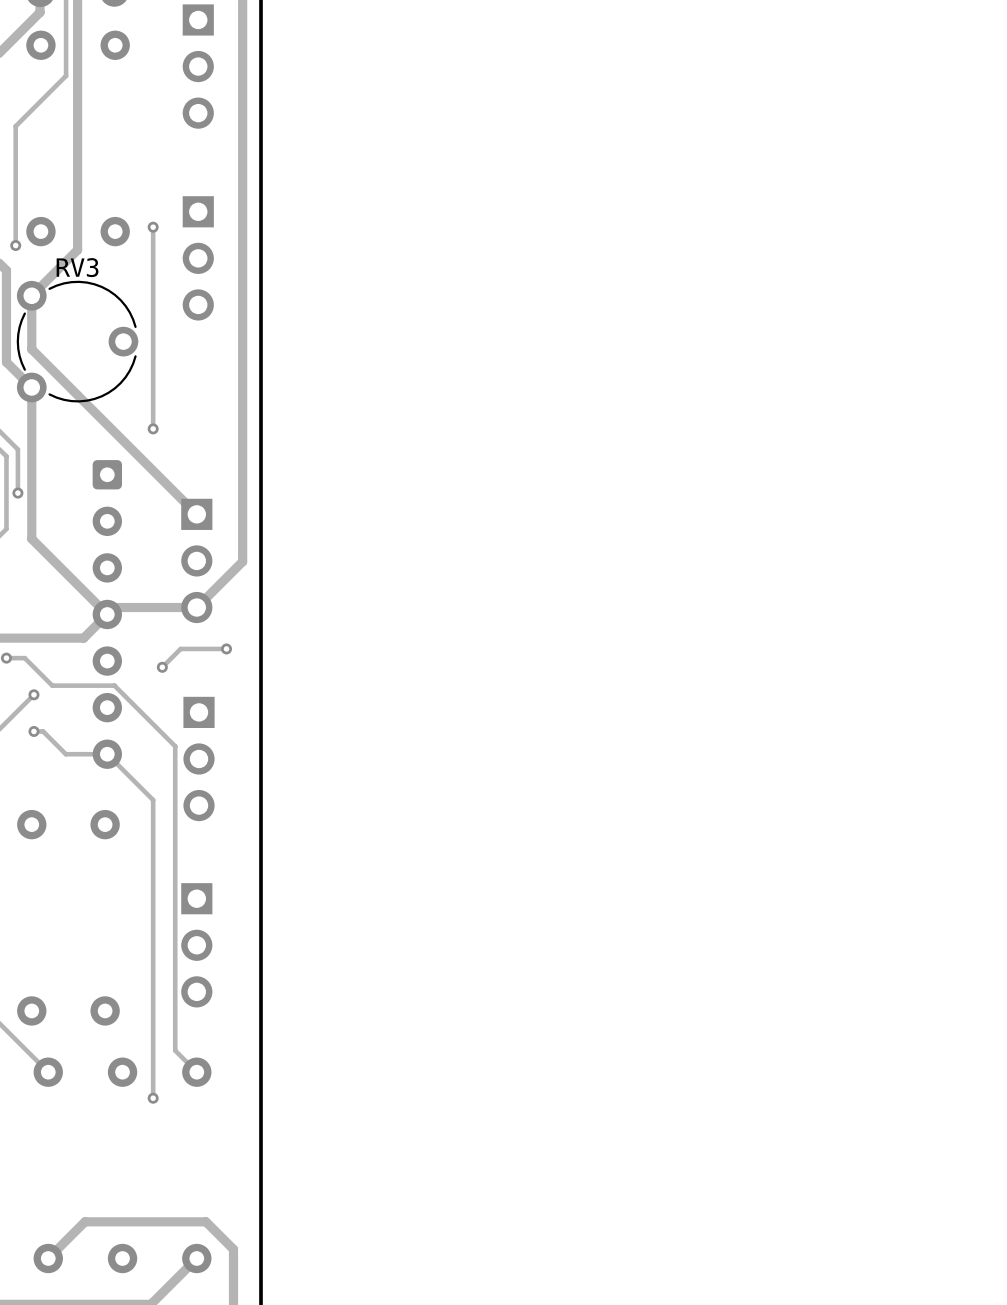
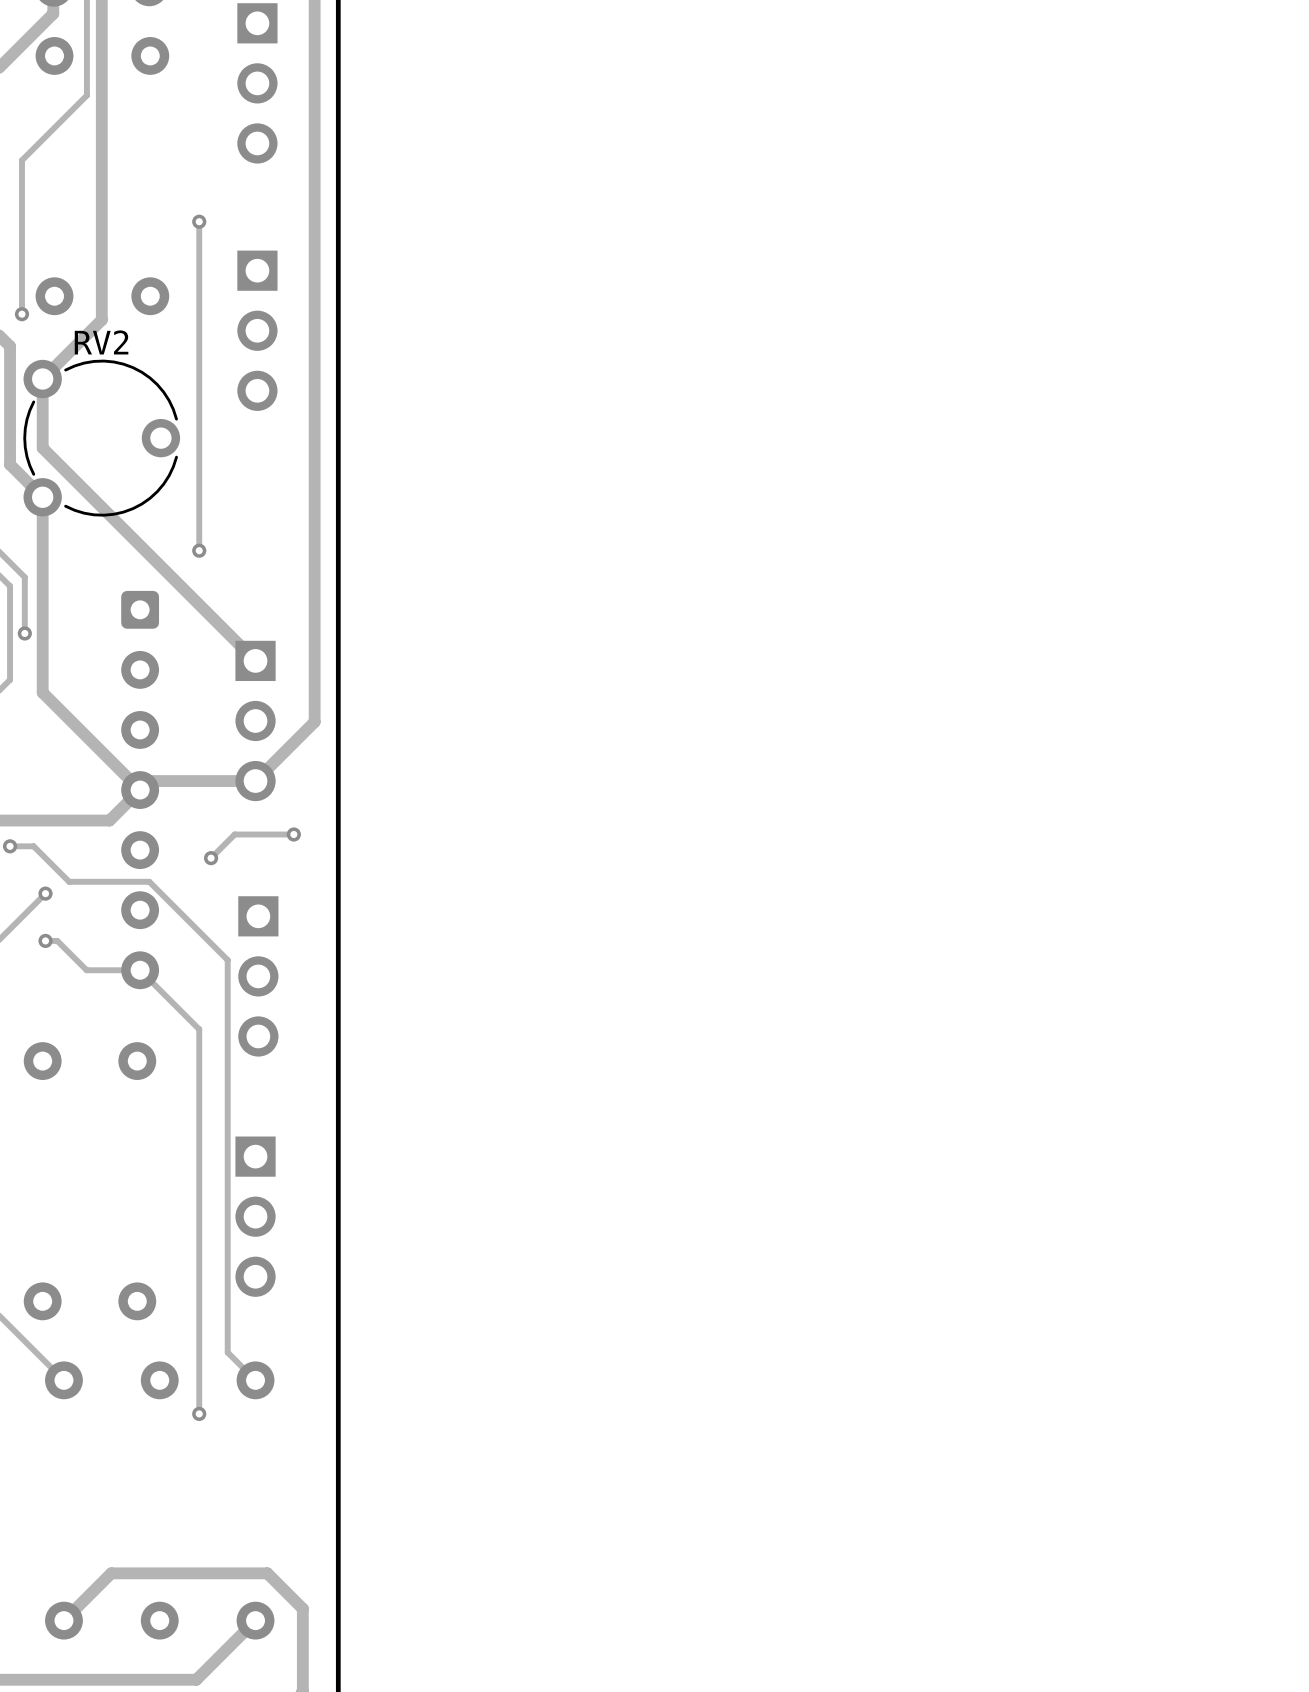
track: none -> (199, 221) (199, 290)
via position: (153, 227) -> (199, 221)
RV3 name: RV3 (77, 267) -> RV2 (101, 342)

